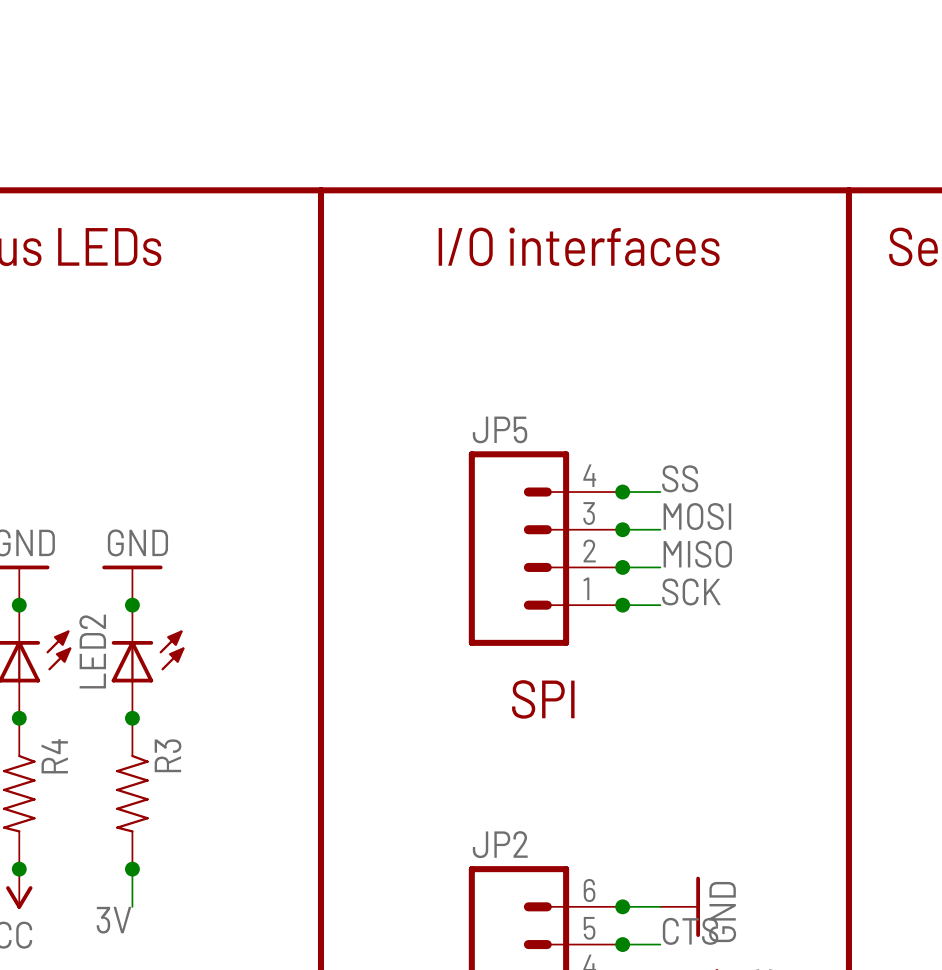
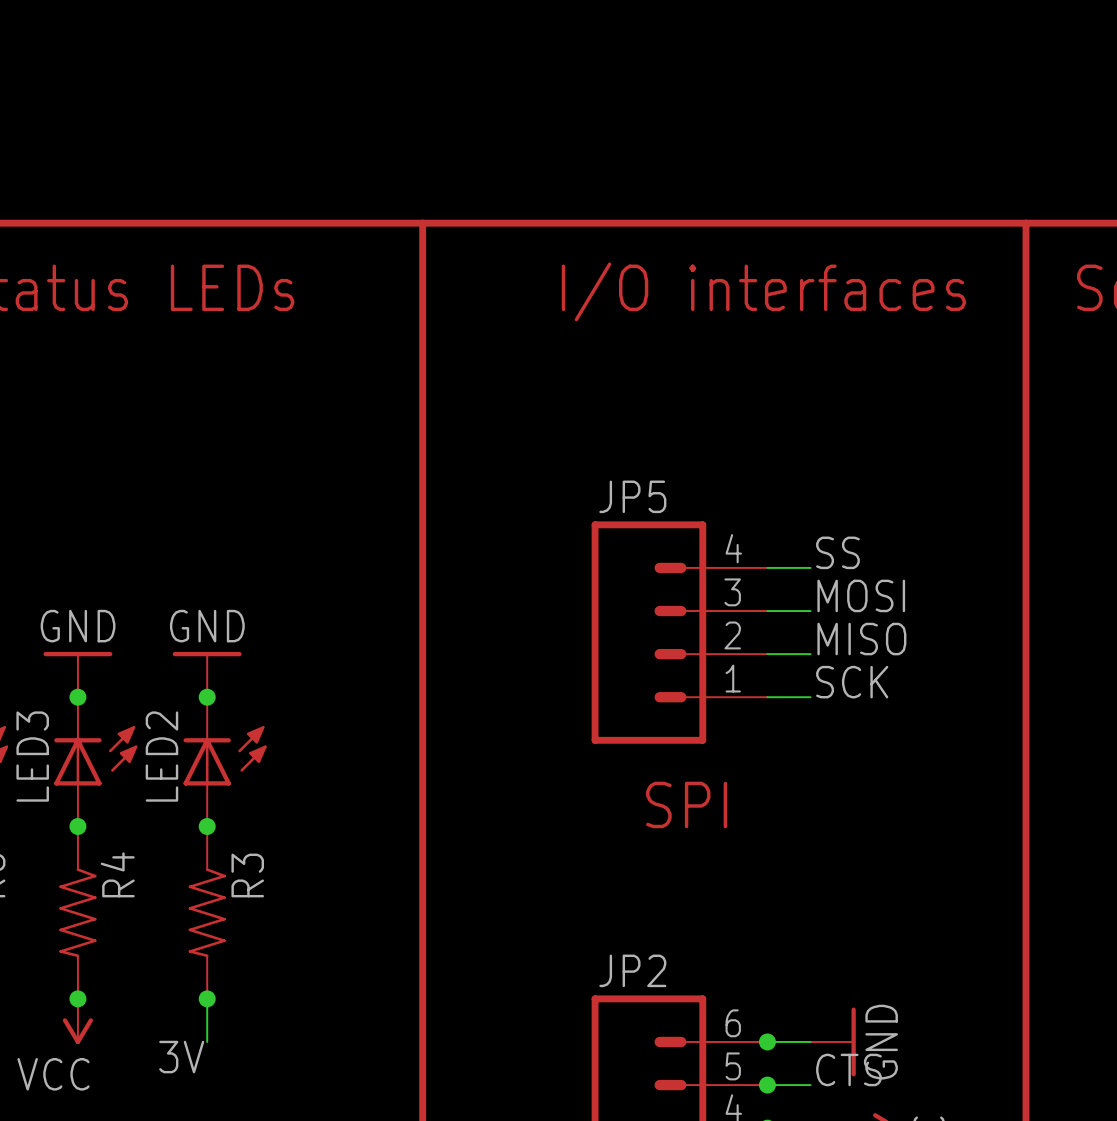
junction: (622, 492) -> none
junction: (622, 529) -> none
junction: (622, 567) -> none
junction: (622, 605) -> none

